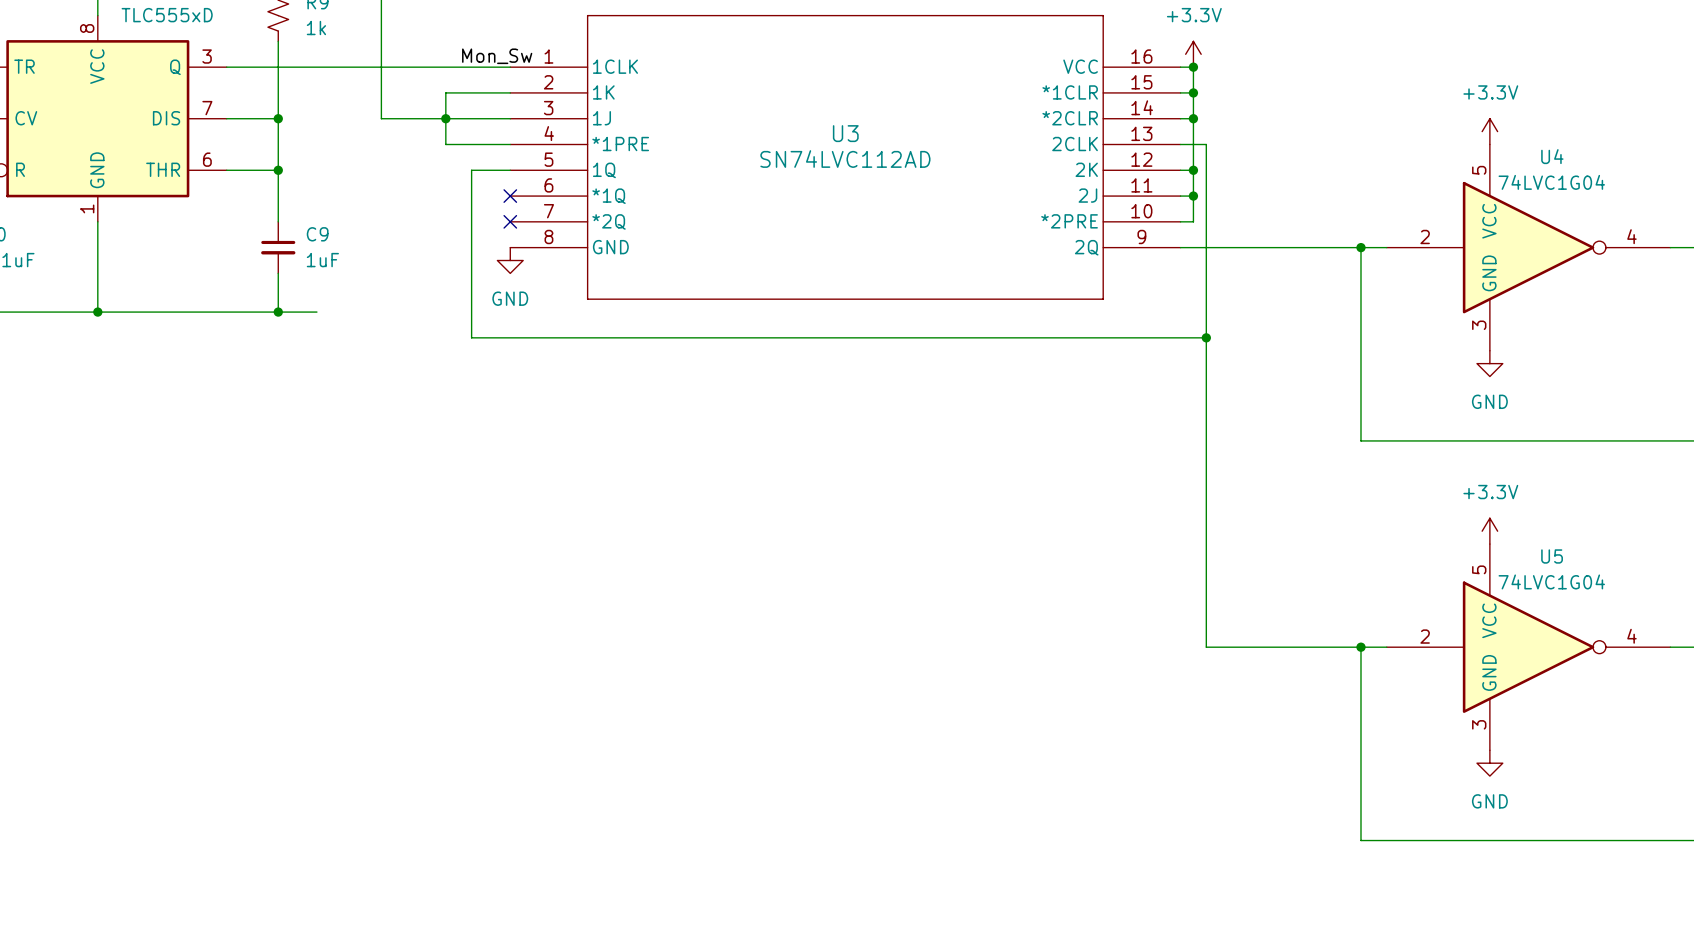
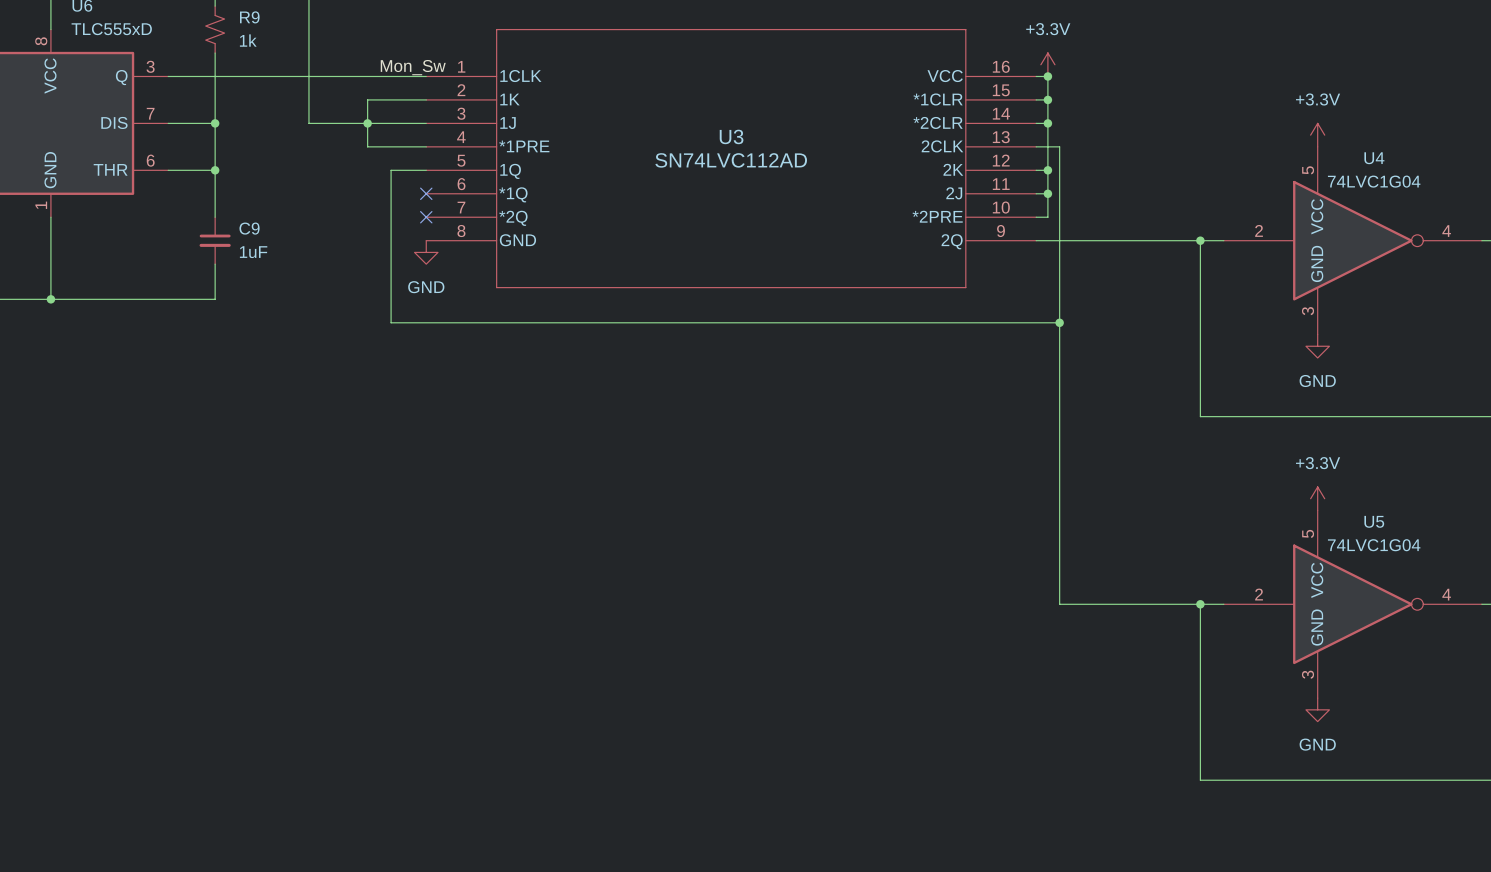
wire: (278, 312) (316, 312) -> none
junction: (278, 312) -> none

